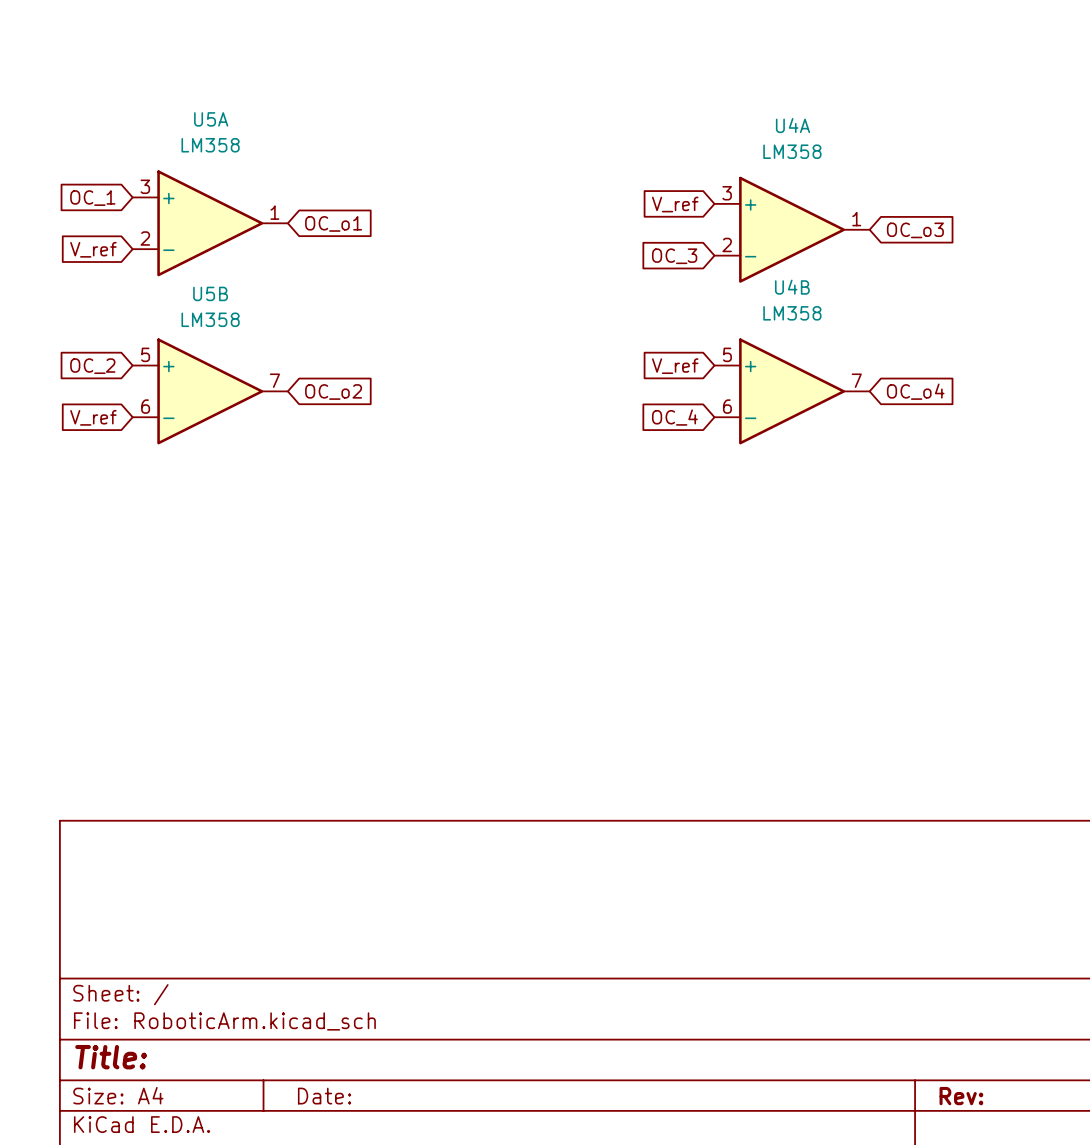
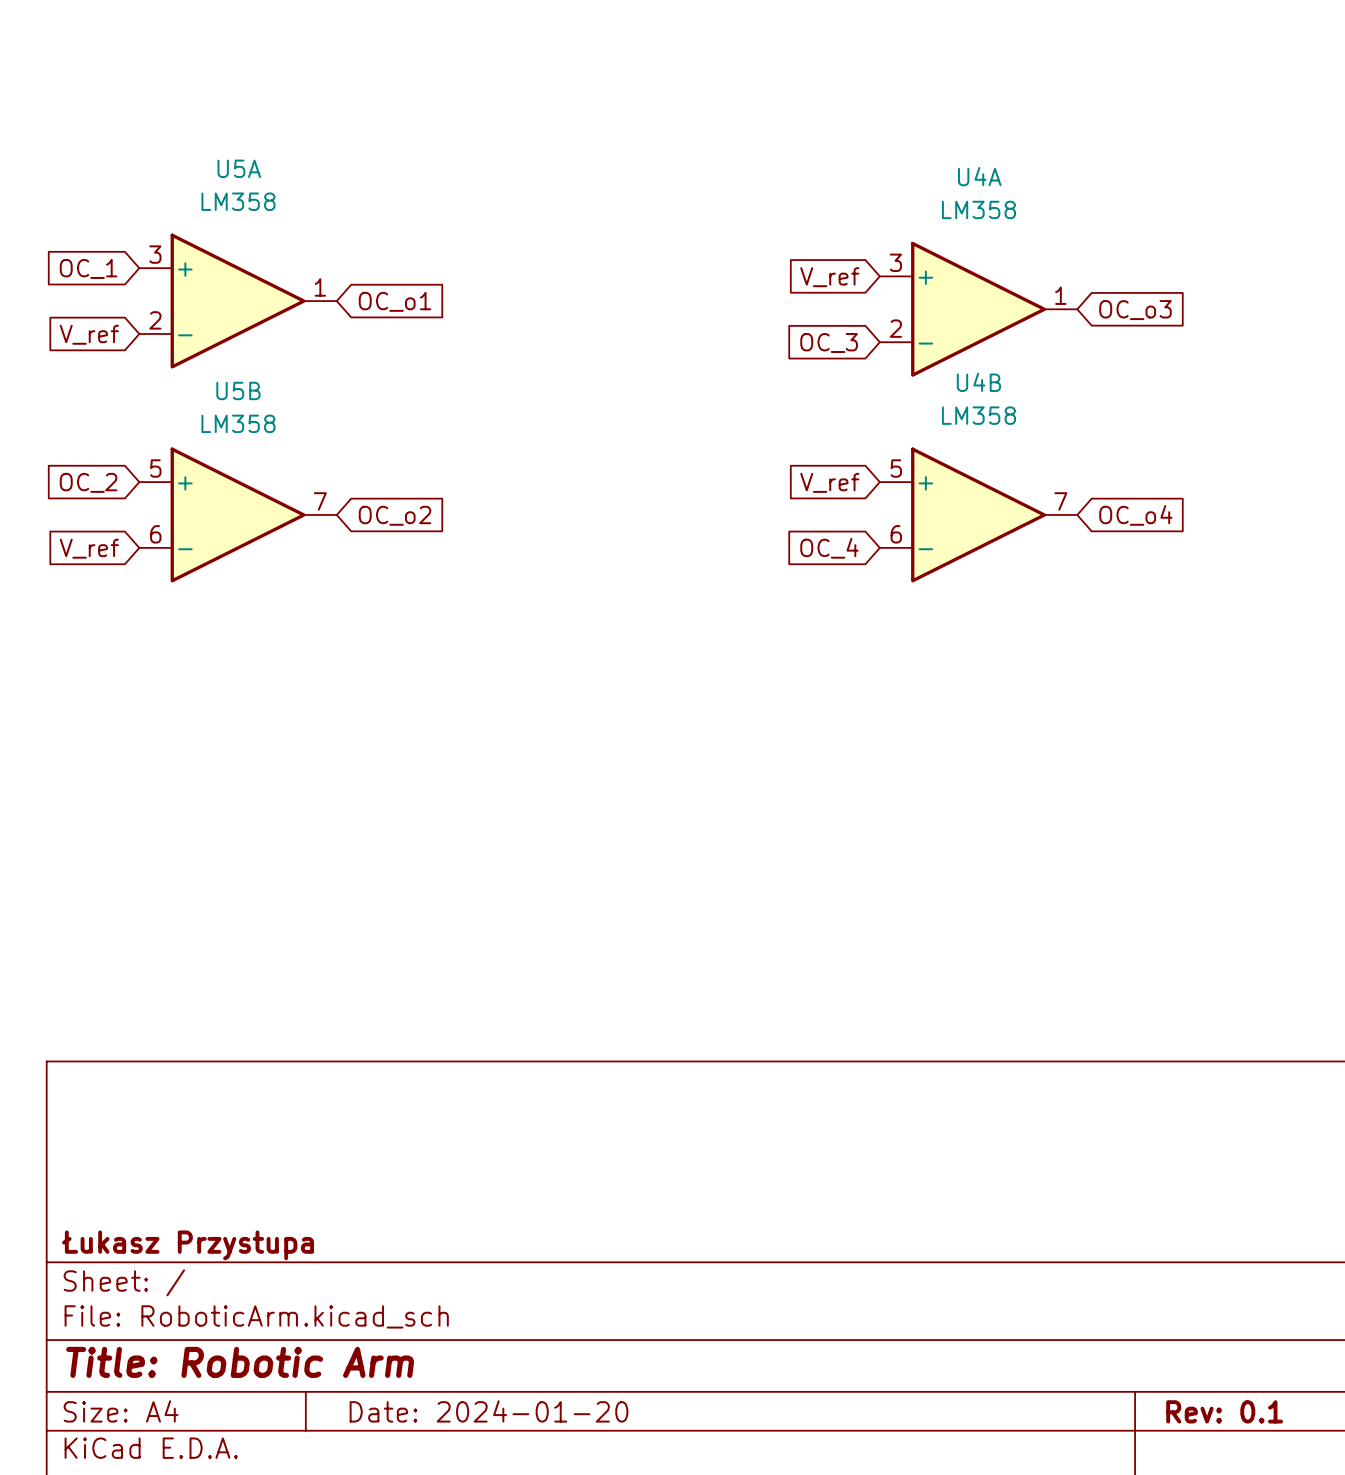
title block: none -> Łukasz Przystupa (188, 1245)
title block: Title: (111, 1057) -> Title: Robotic Arm (240, 1362)
title block: Date: (324, 1096) -> Date: 2024-01-20 (488, 1411)
title block: Rev: (961, 1096) -> Rev: 0.1 (1224, 1411)

